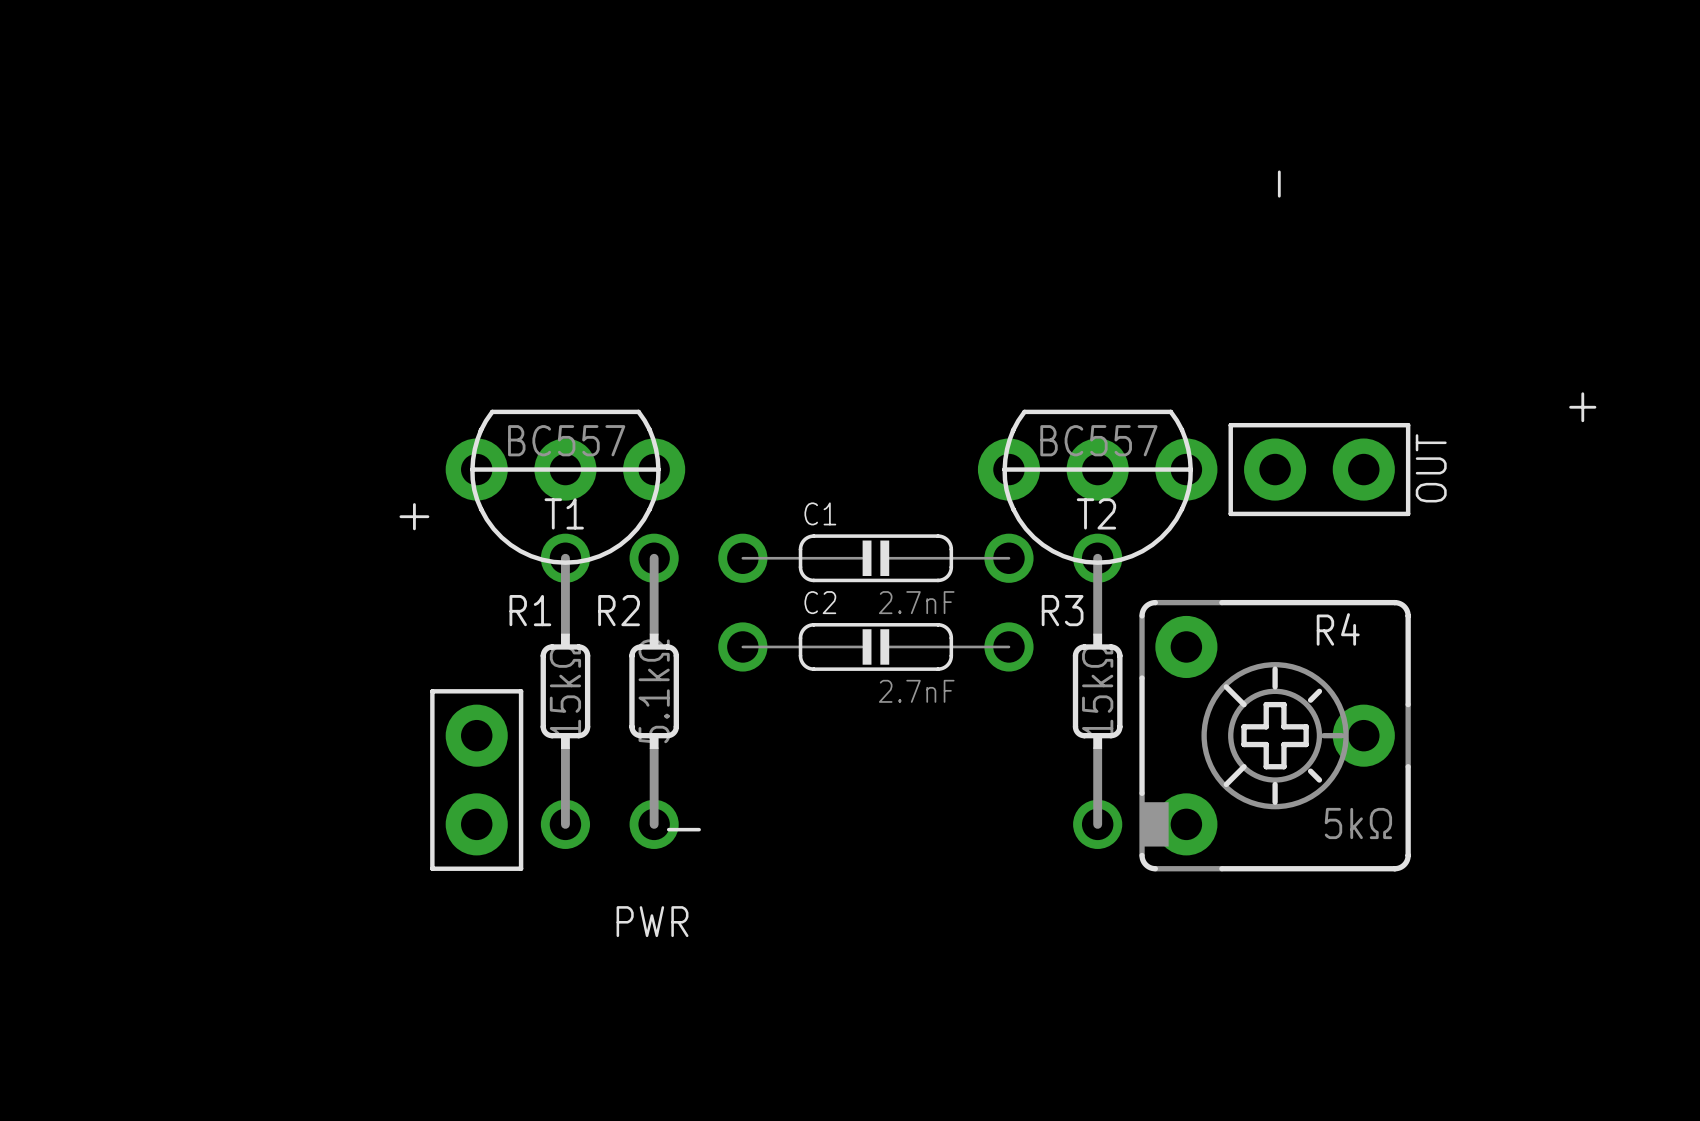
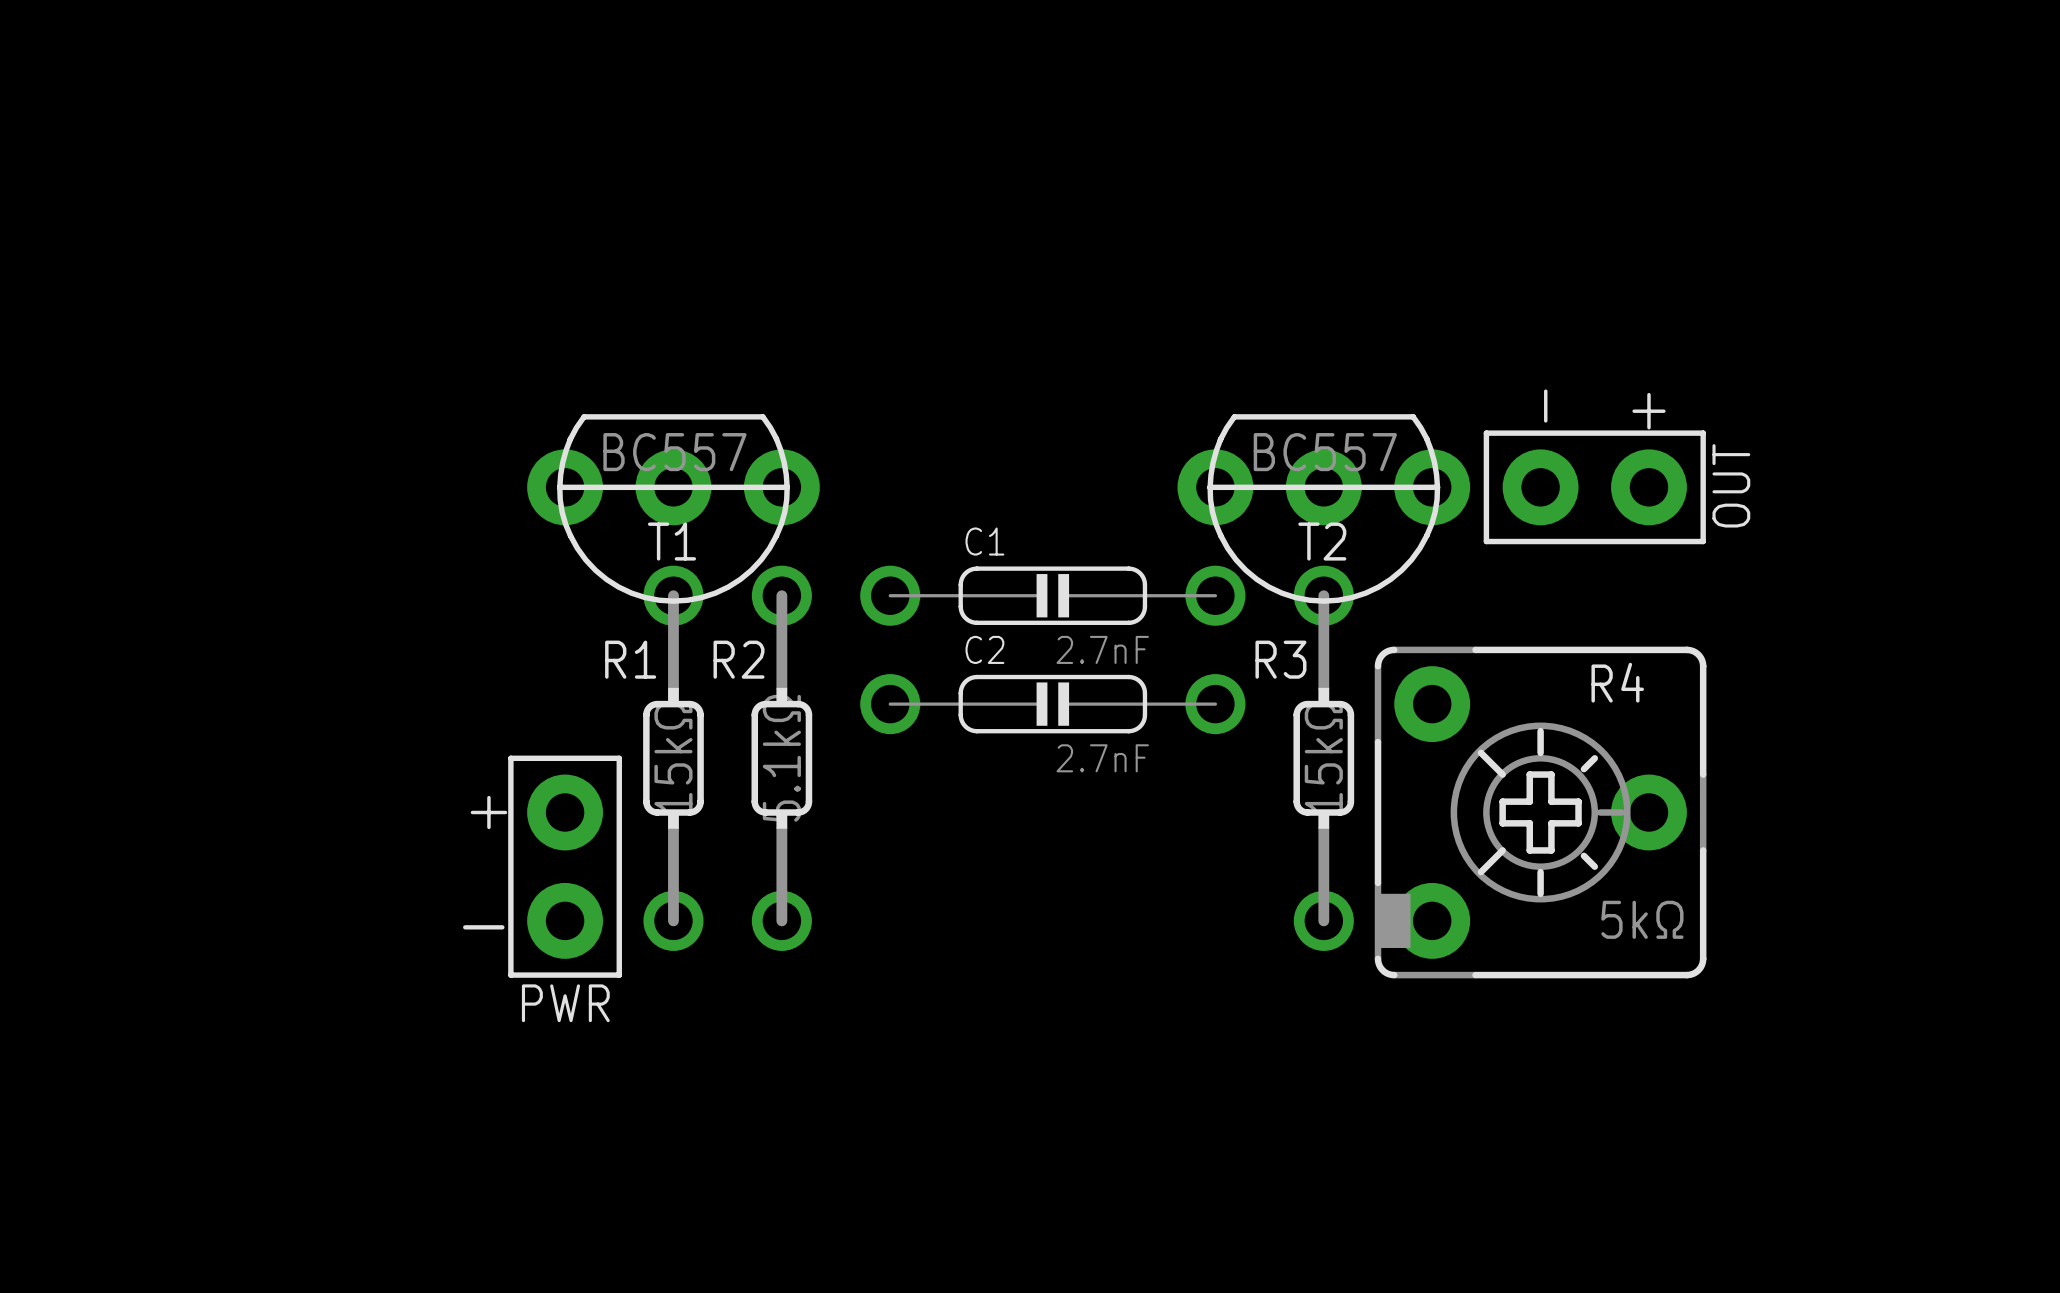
OUT footprint: [1228, 422, 1411, 517] -> [1483, 430, 1706, 545]
part footprint: [430, 689, 524, 871] -> [508, 755, 622, 978]

